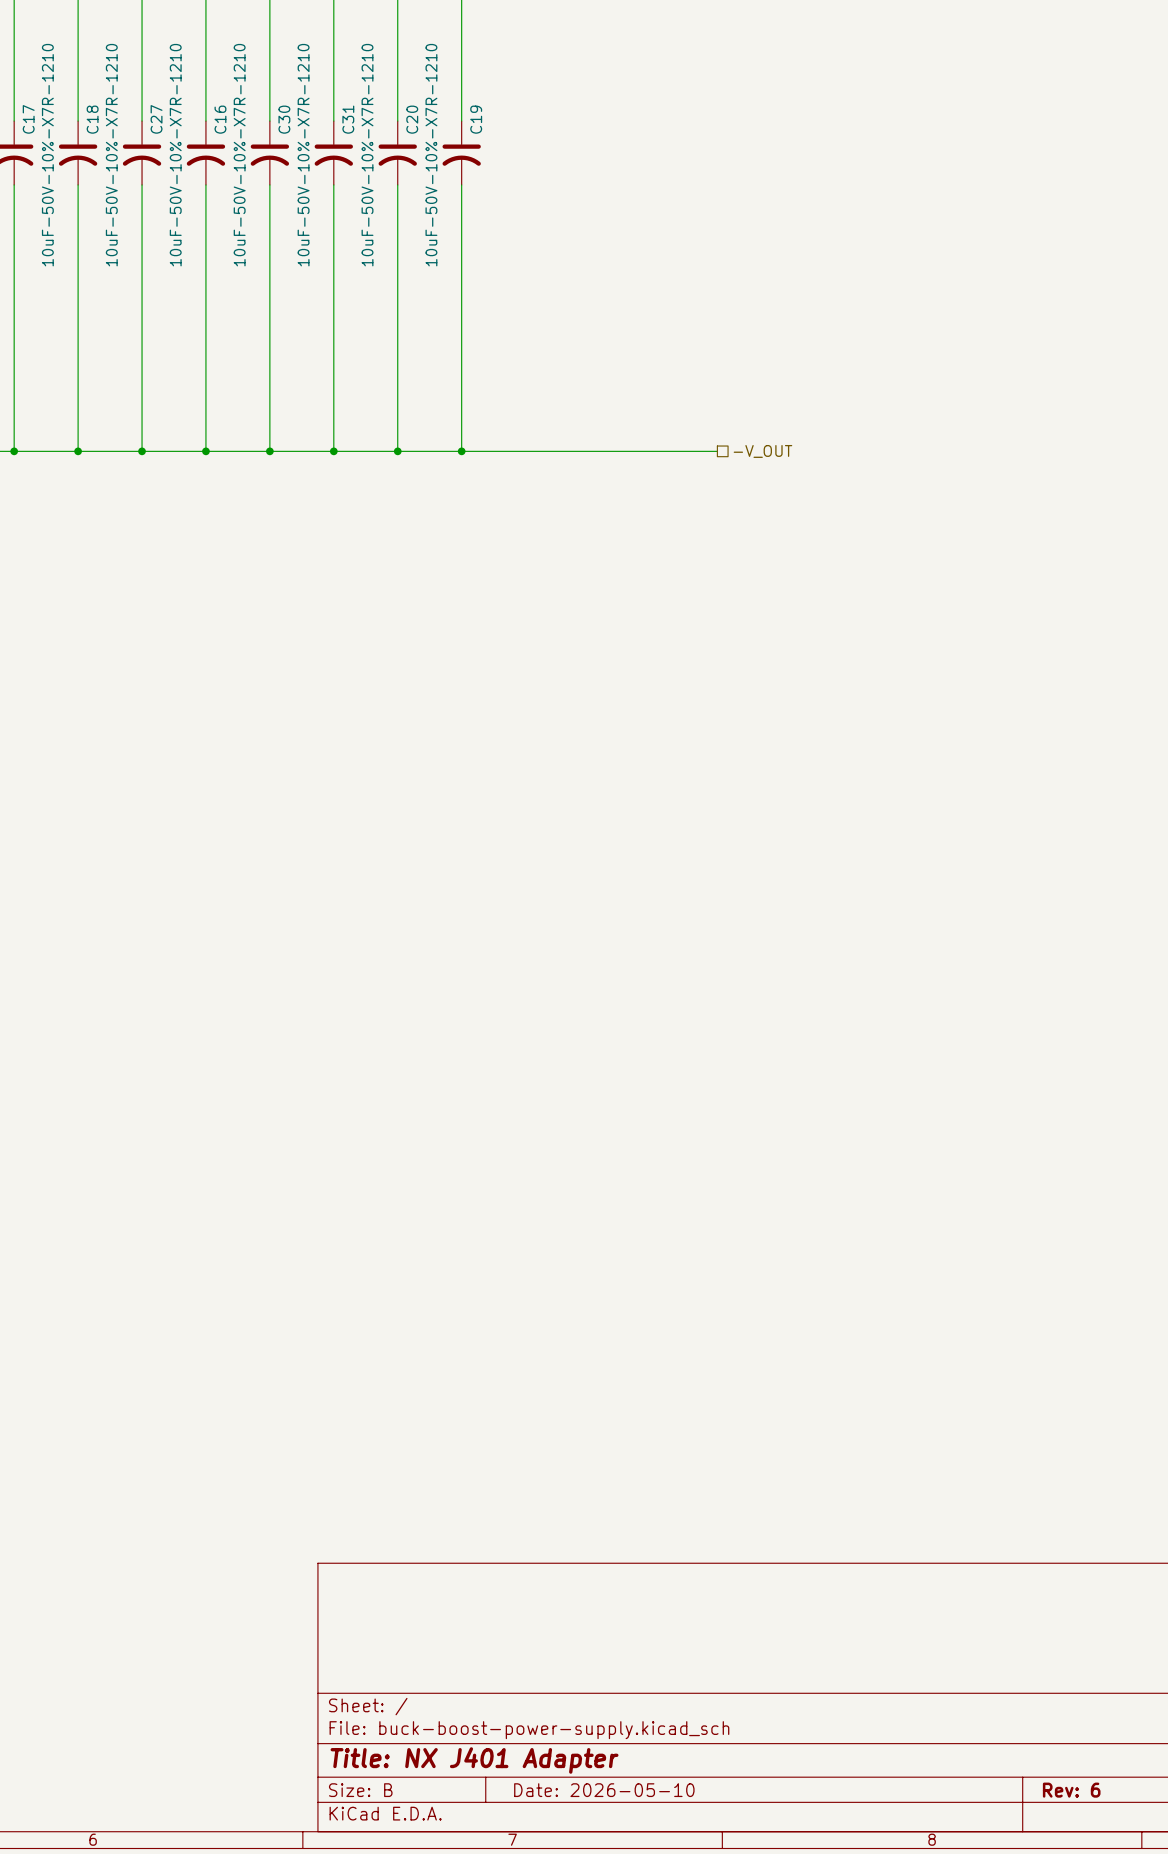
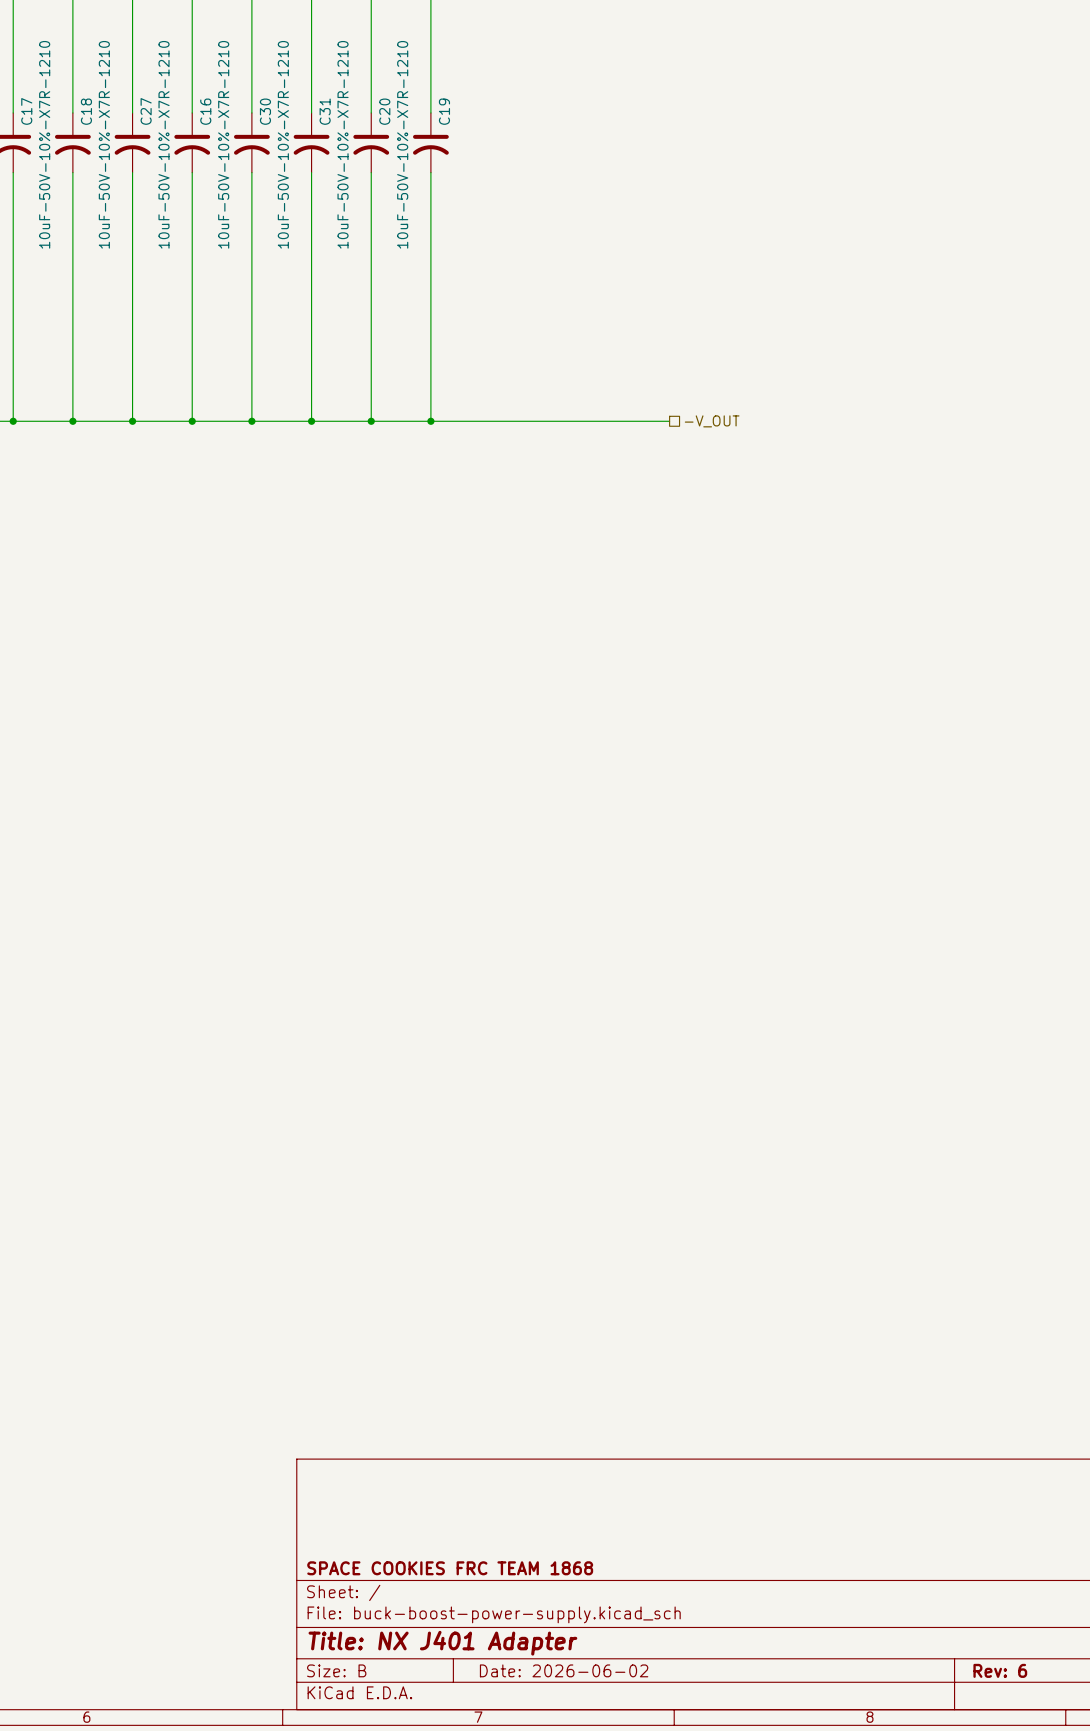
title block: none -> SPACE COOKIES FRC TEAM 1868 (450, 1568)
title block: Date: 2026-05-10 (604, 1790) -> Date: 2026-06-02 (564, 1670)

